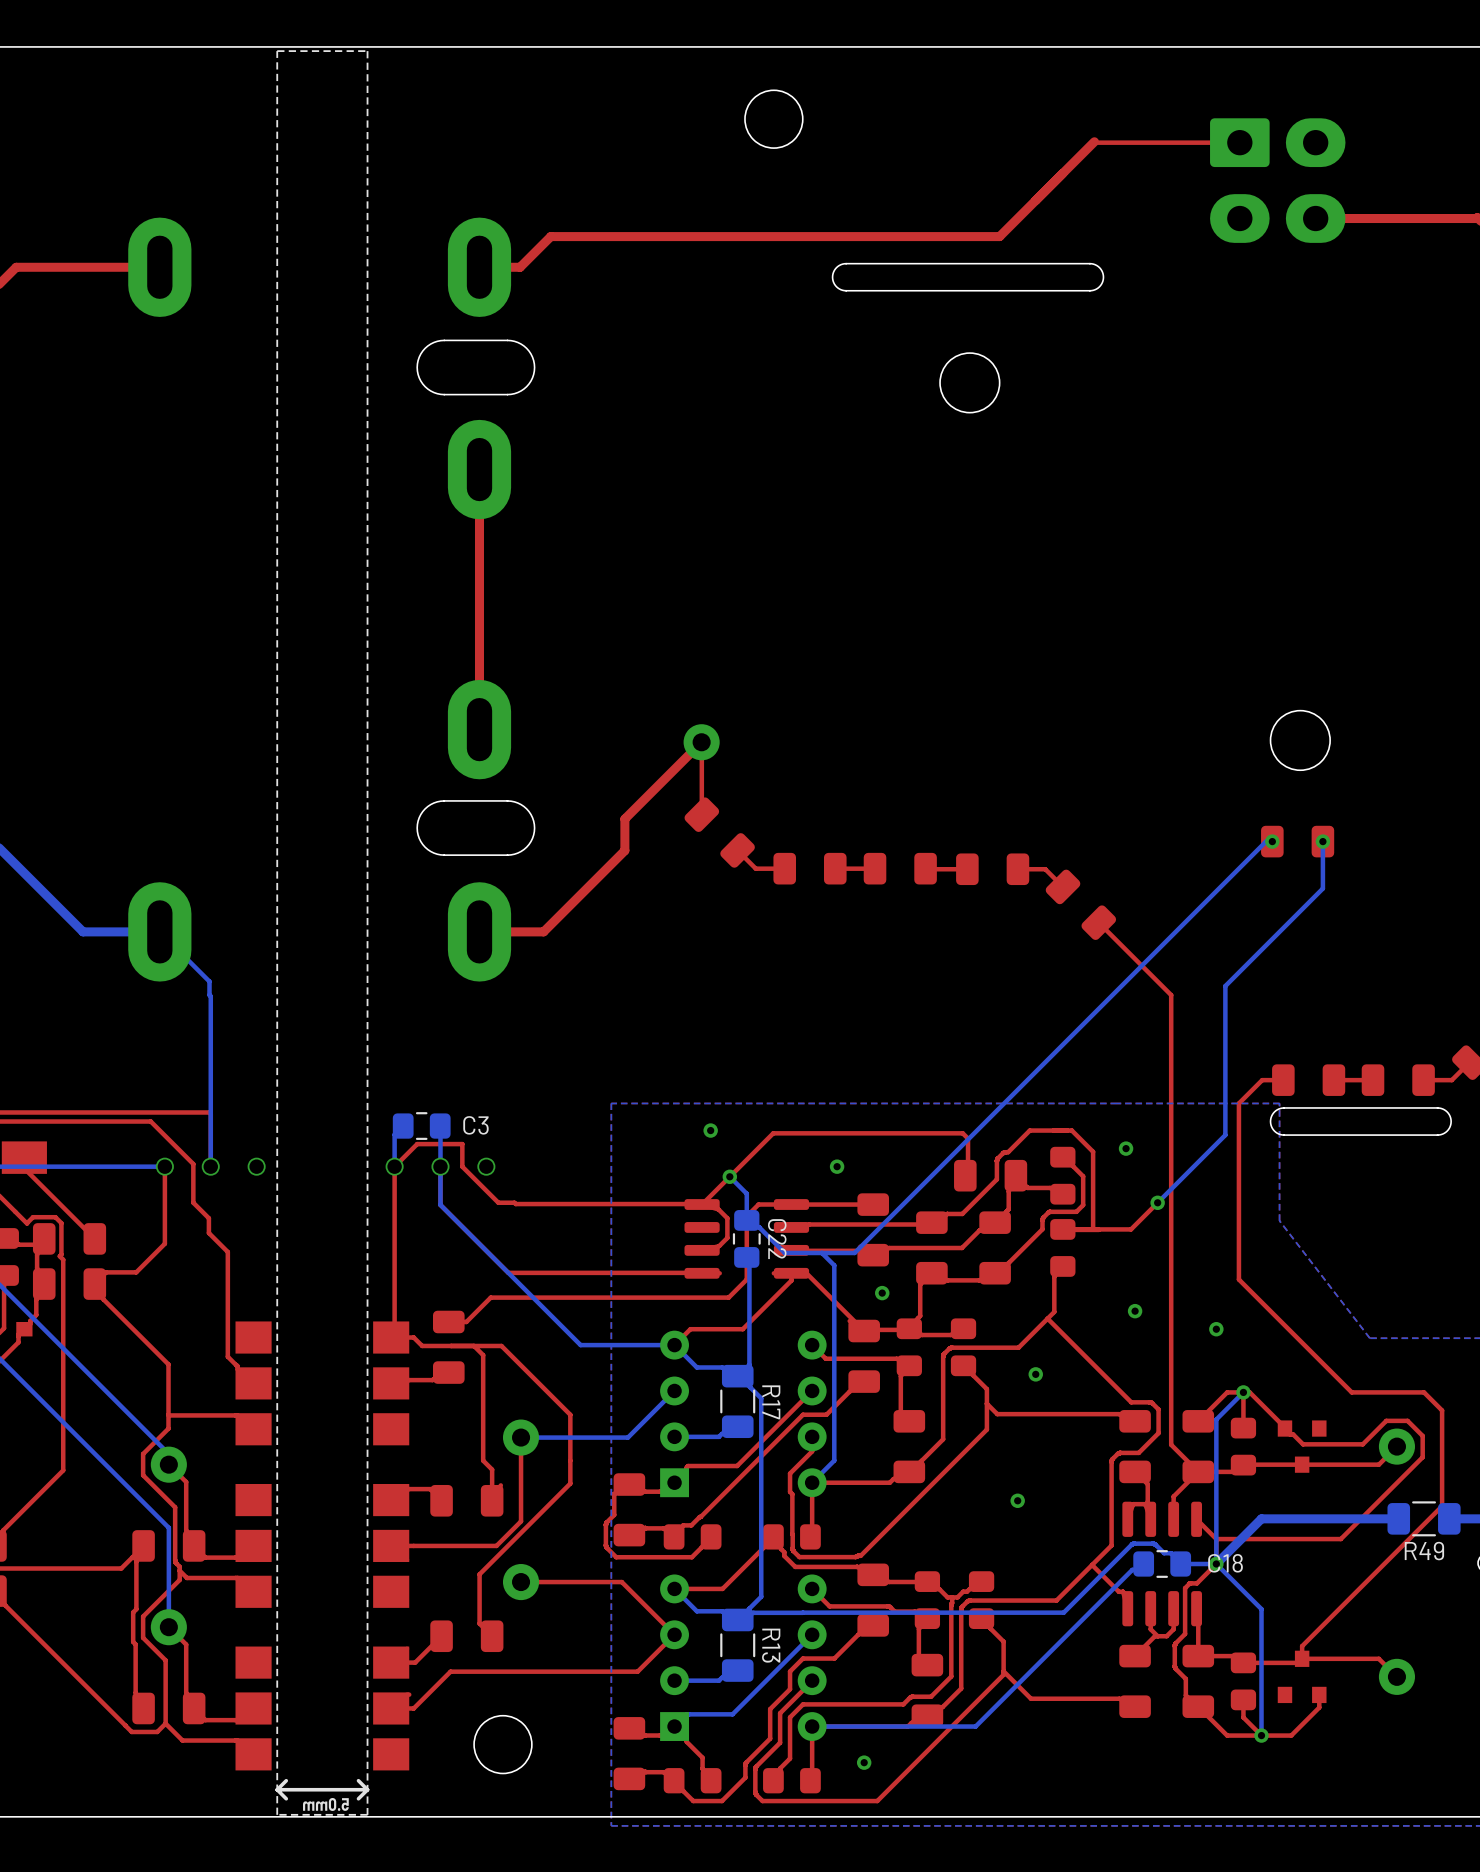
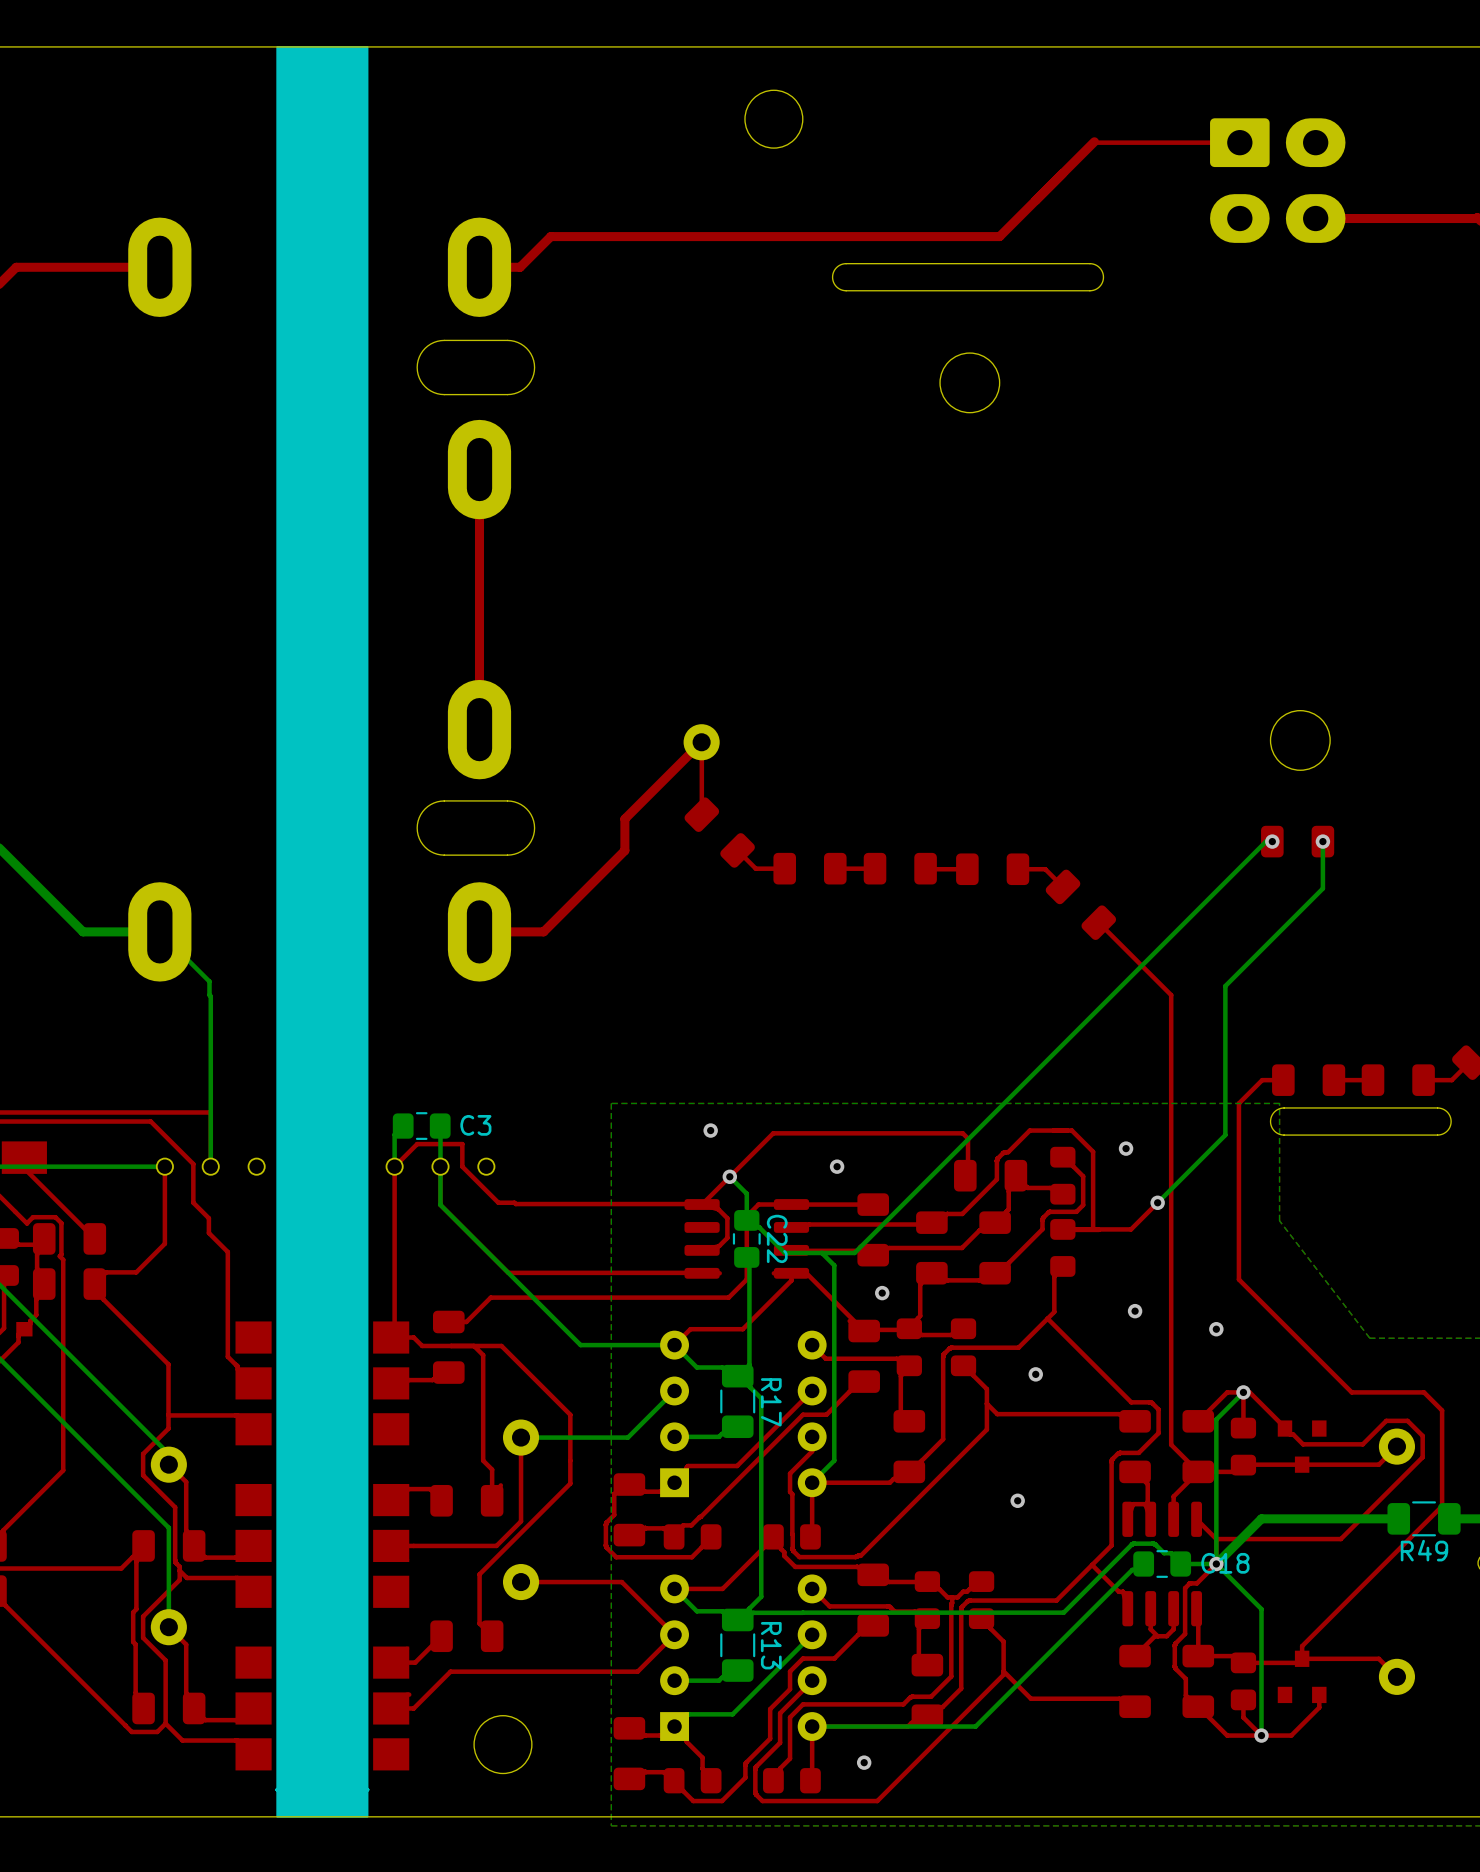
drawing: none -> [276, 46, 369, 1818]
line: (367, 51) (277, 51) (277, 1814) (367, 1814) (367, 51) -> none

